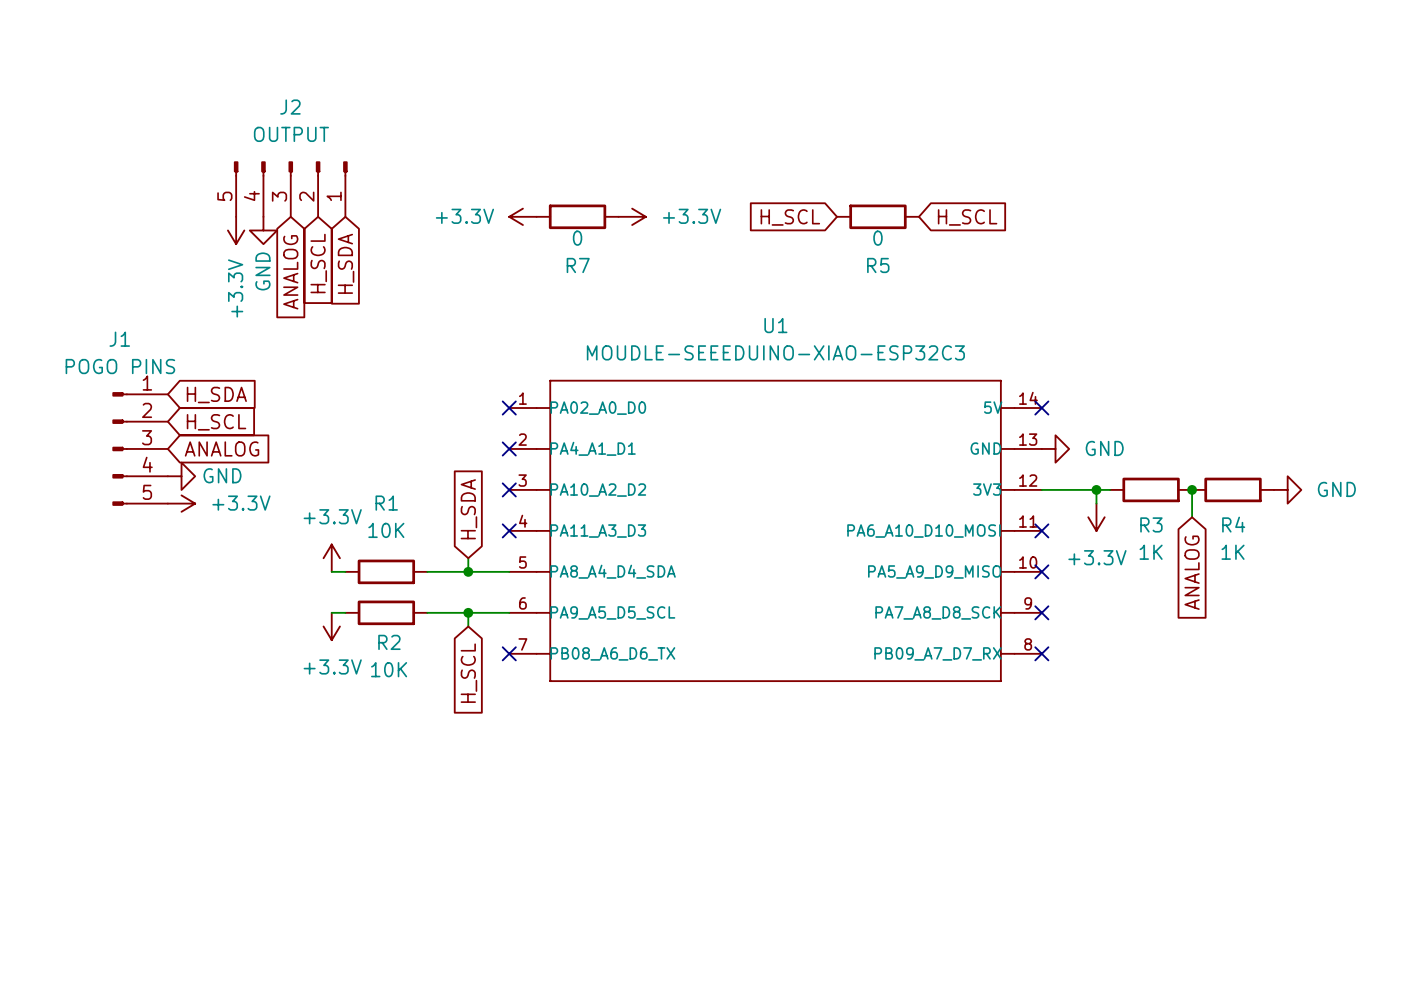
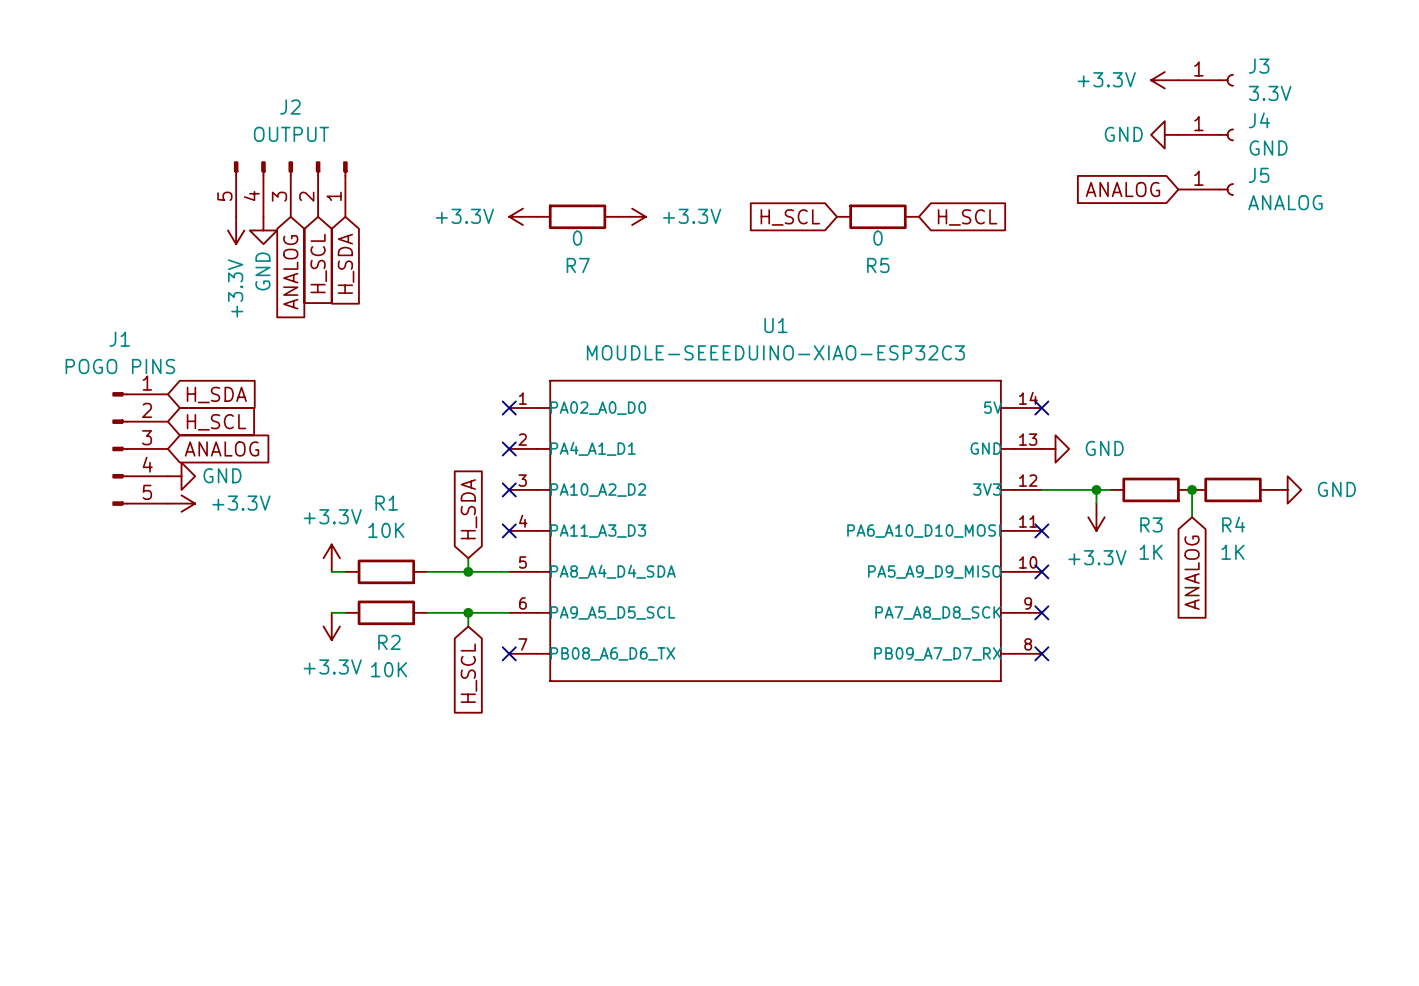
power symbol: none -> +3.3V (1164, 80)
J3: none -> 3.3V (1206, 80)
power symbol: none -> GND (1164, 134)
J4: none -> GND (1206, 134)
global label: none -> ANALOG (1122, 189)
J5: none -> ANALOG (1206, 189)

